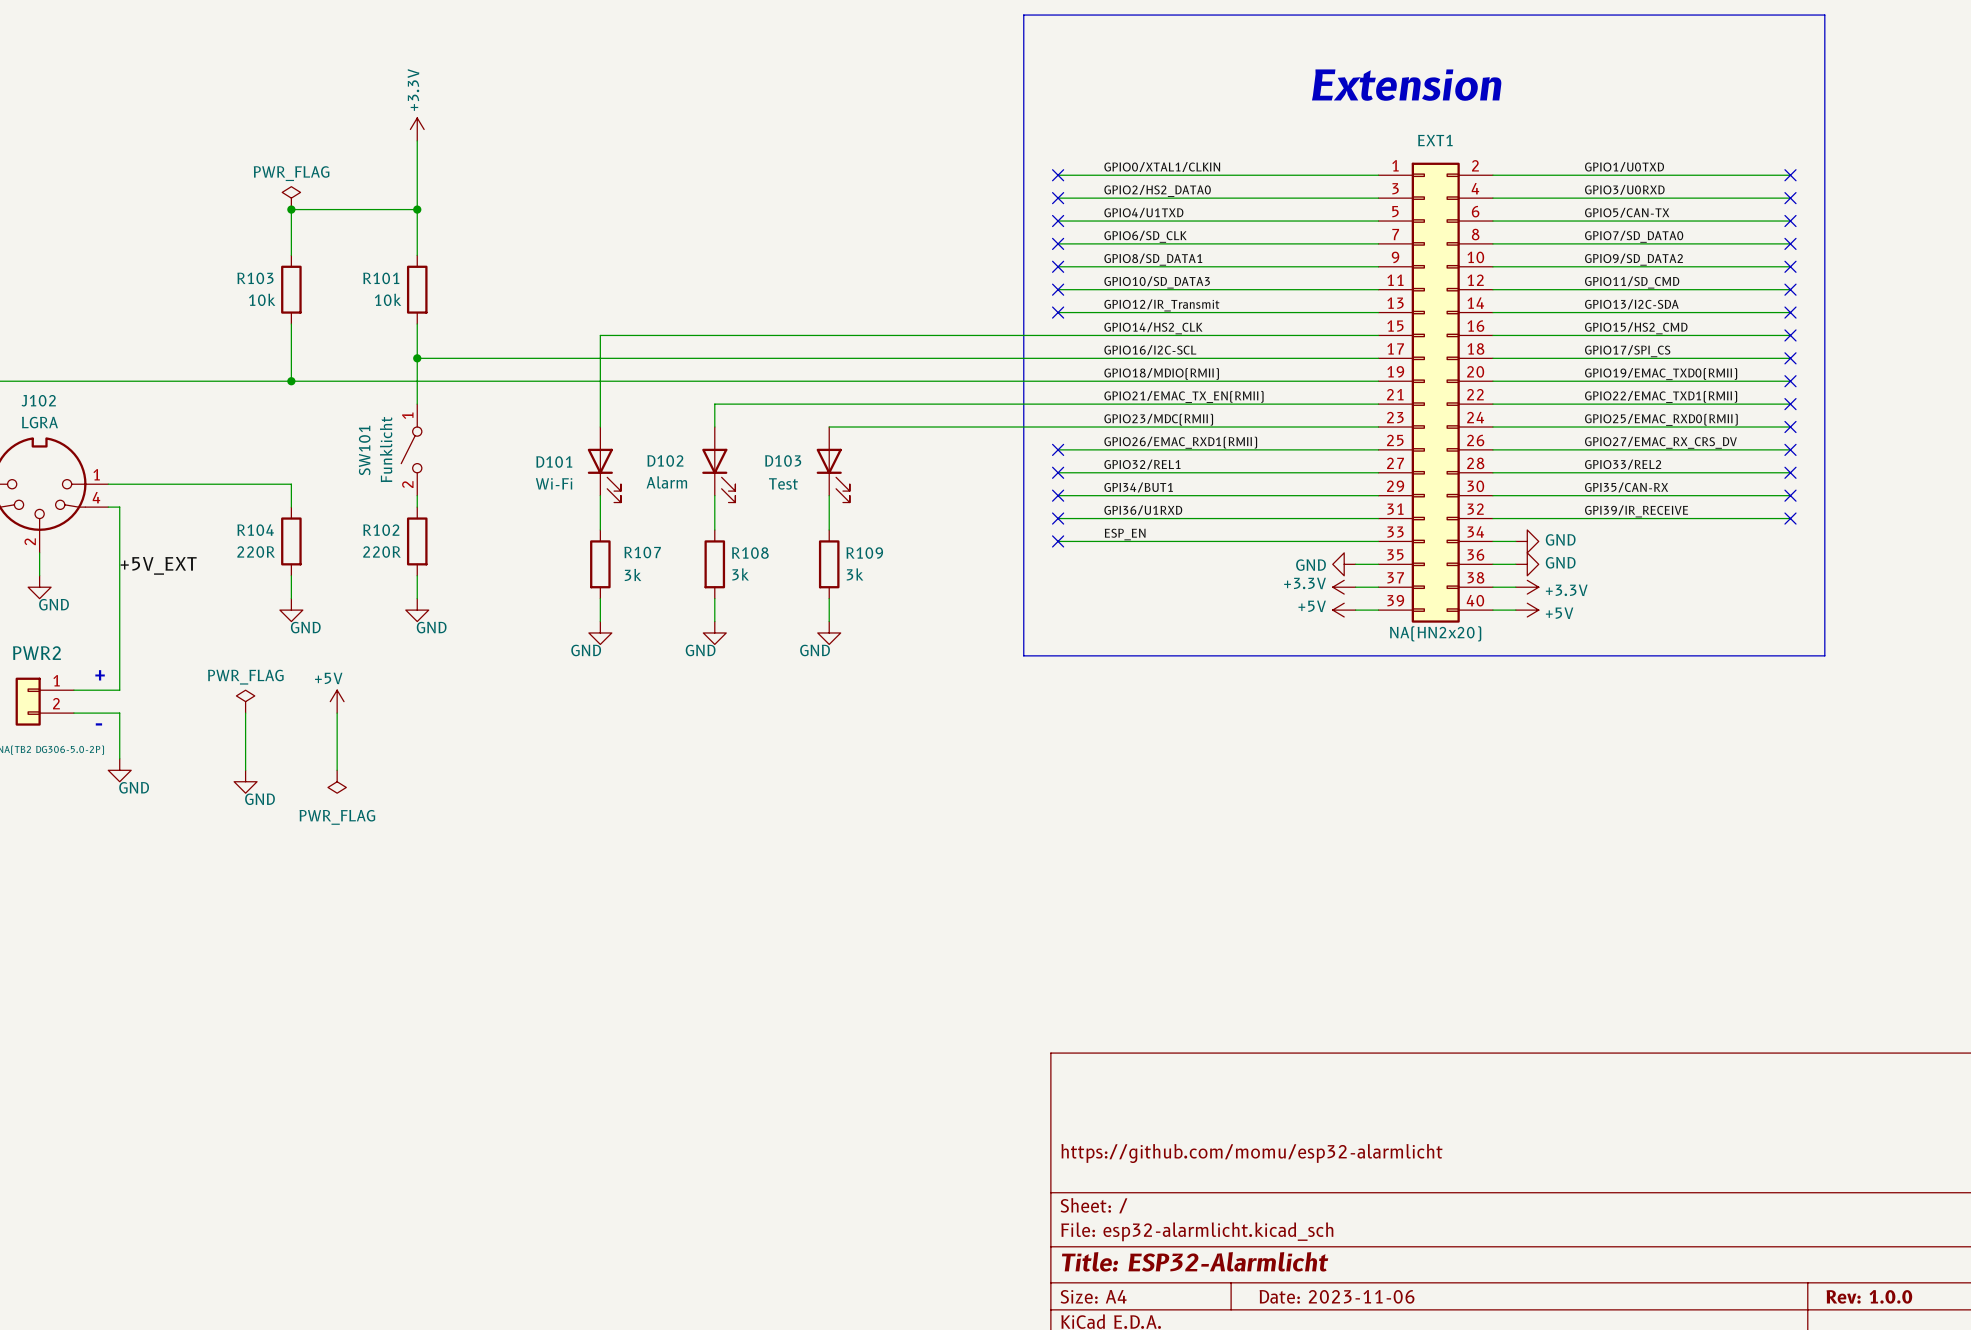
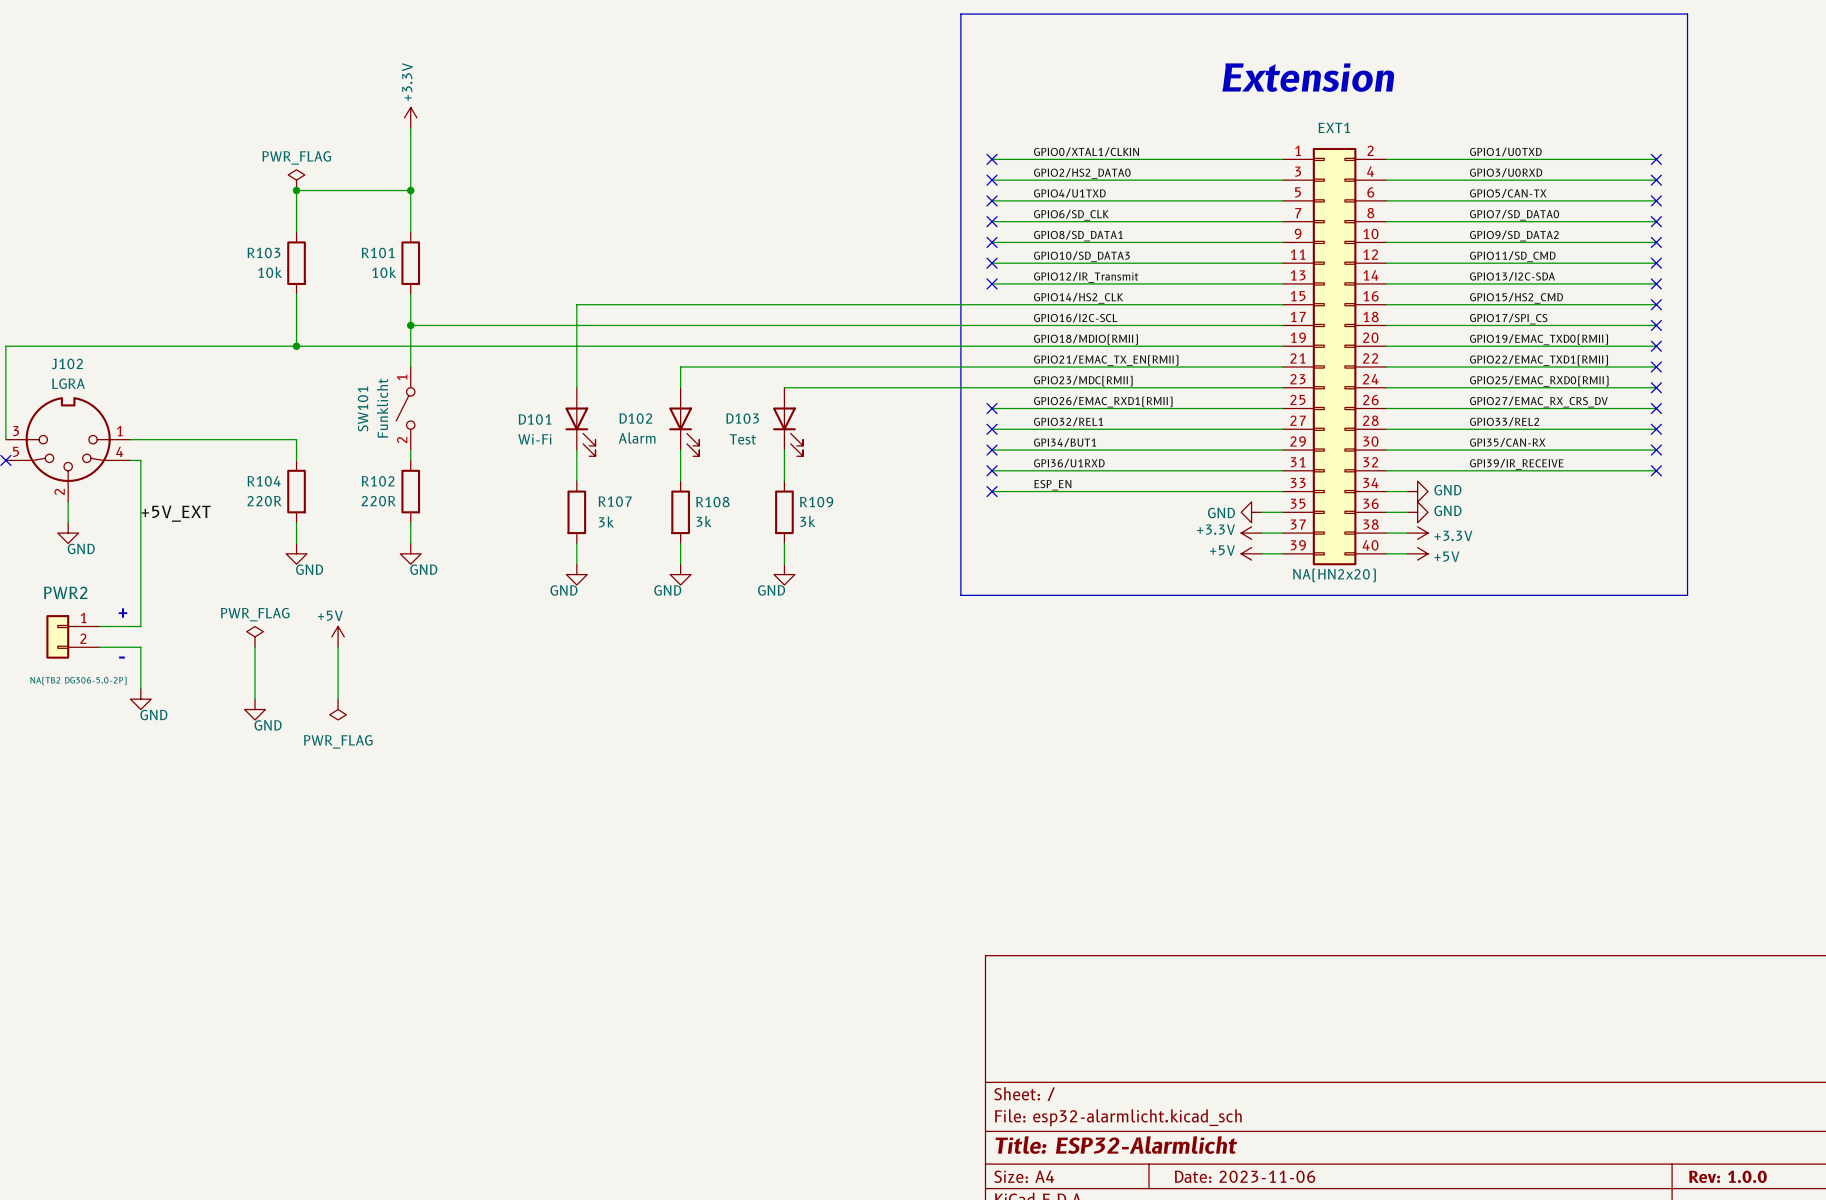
title block: https://github.com/momu/esp32-alarmlicht (1251, 1153) -> none

